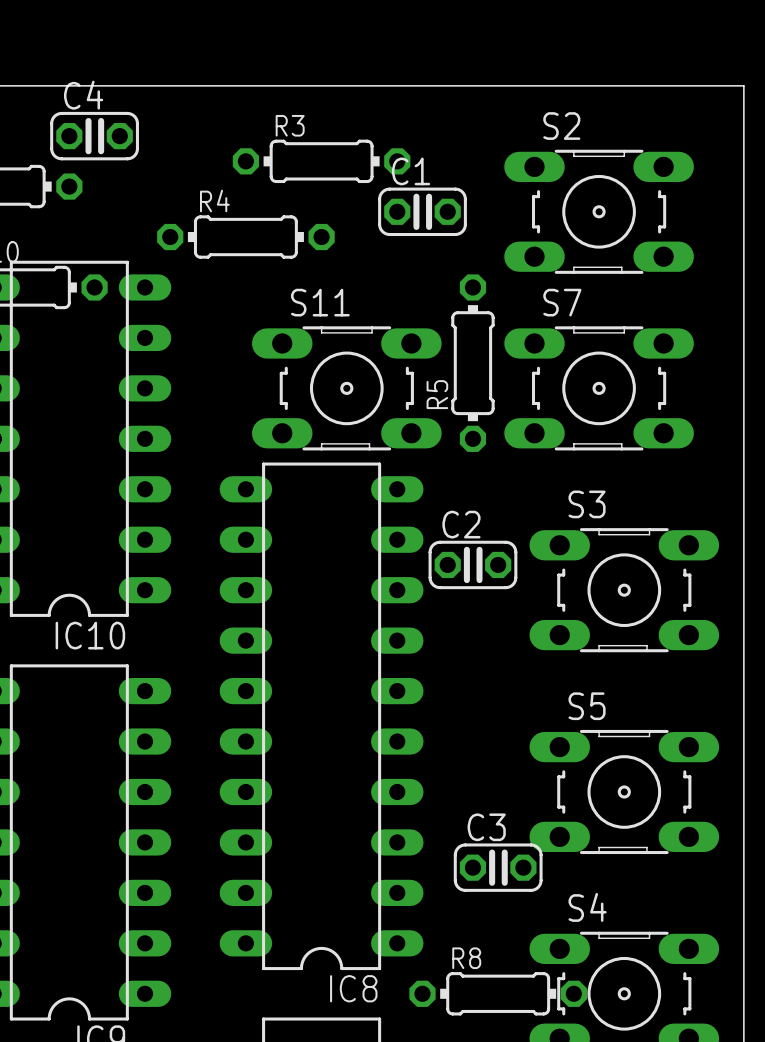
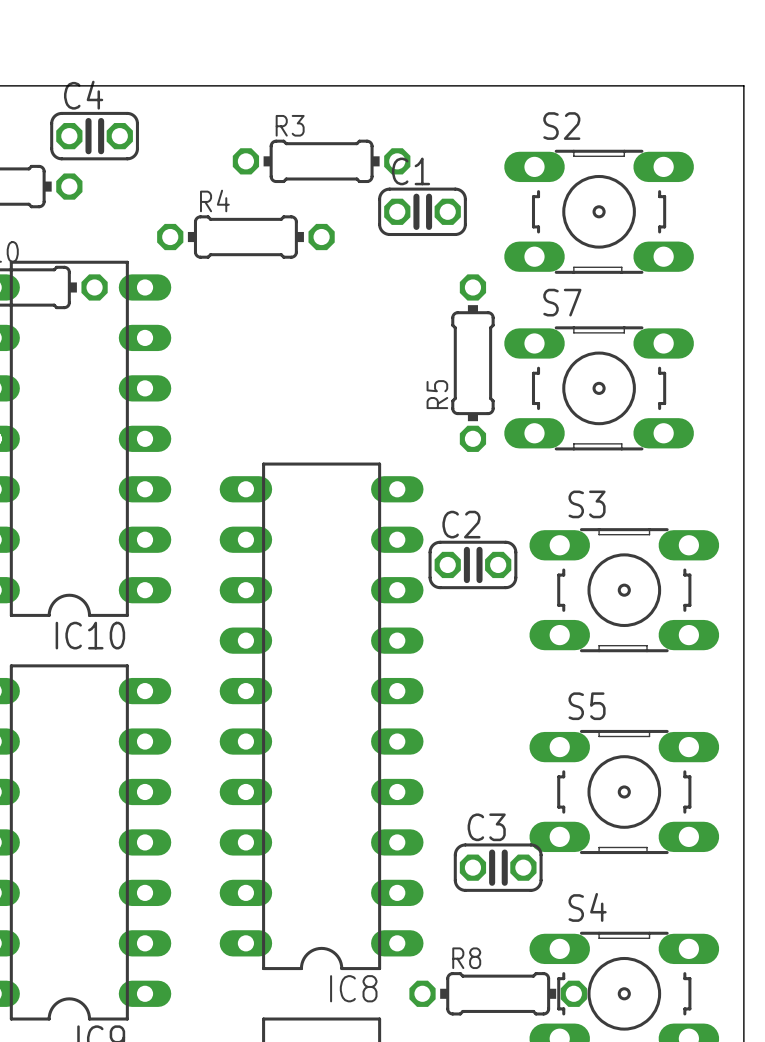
S11: (346, 388) -> none

